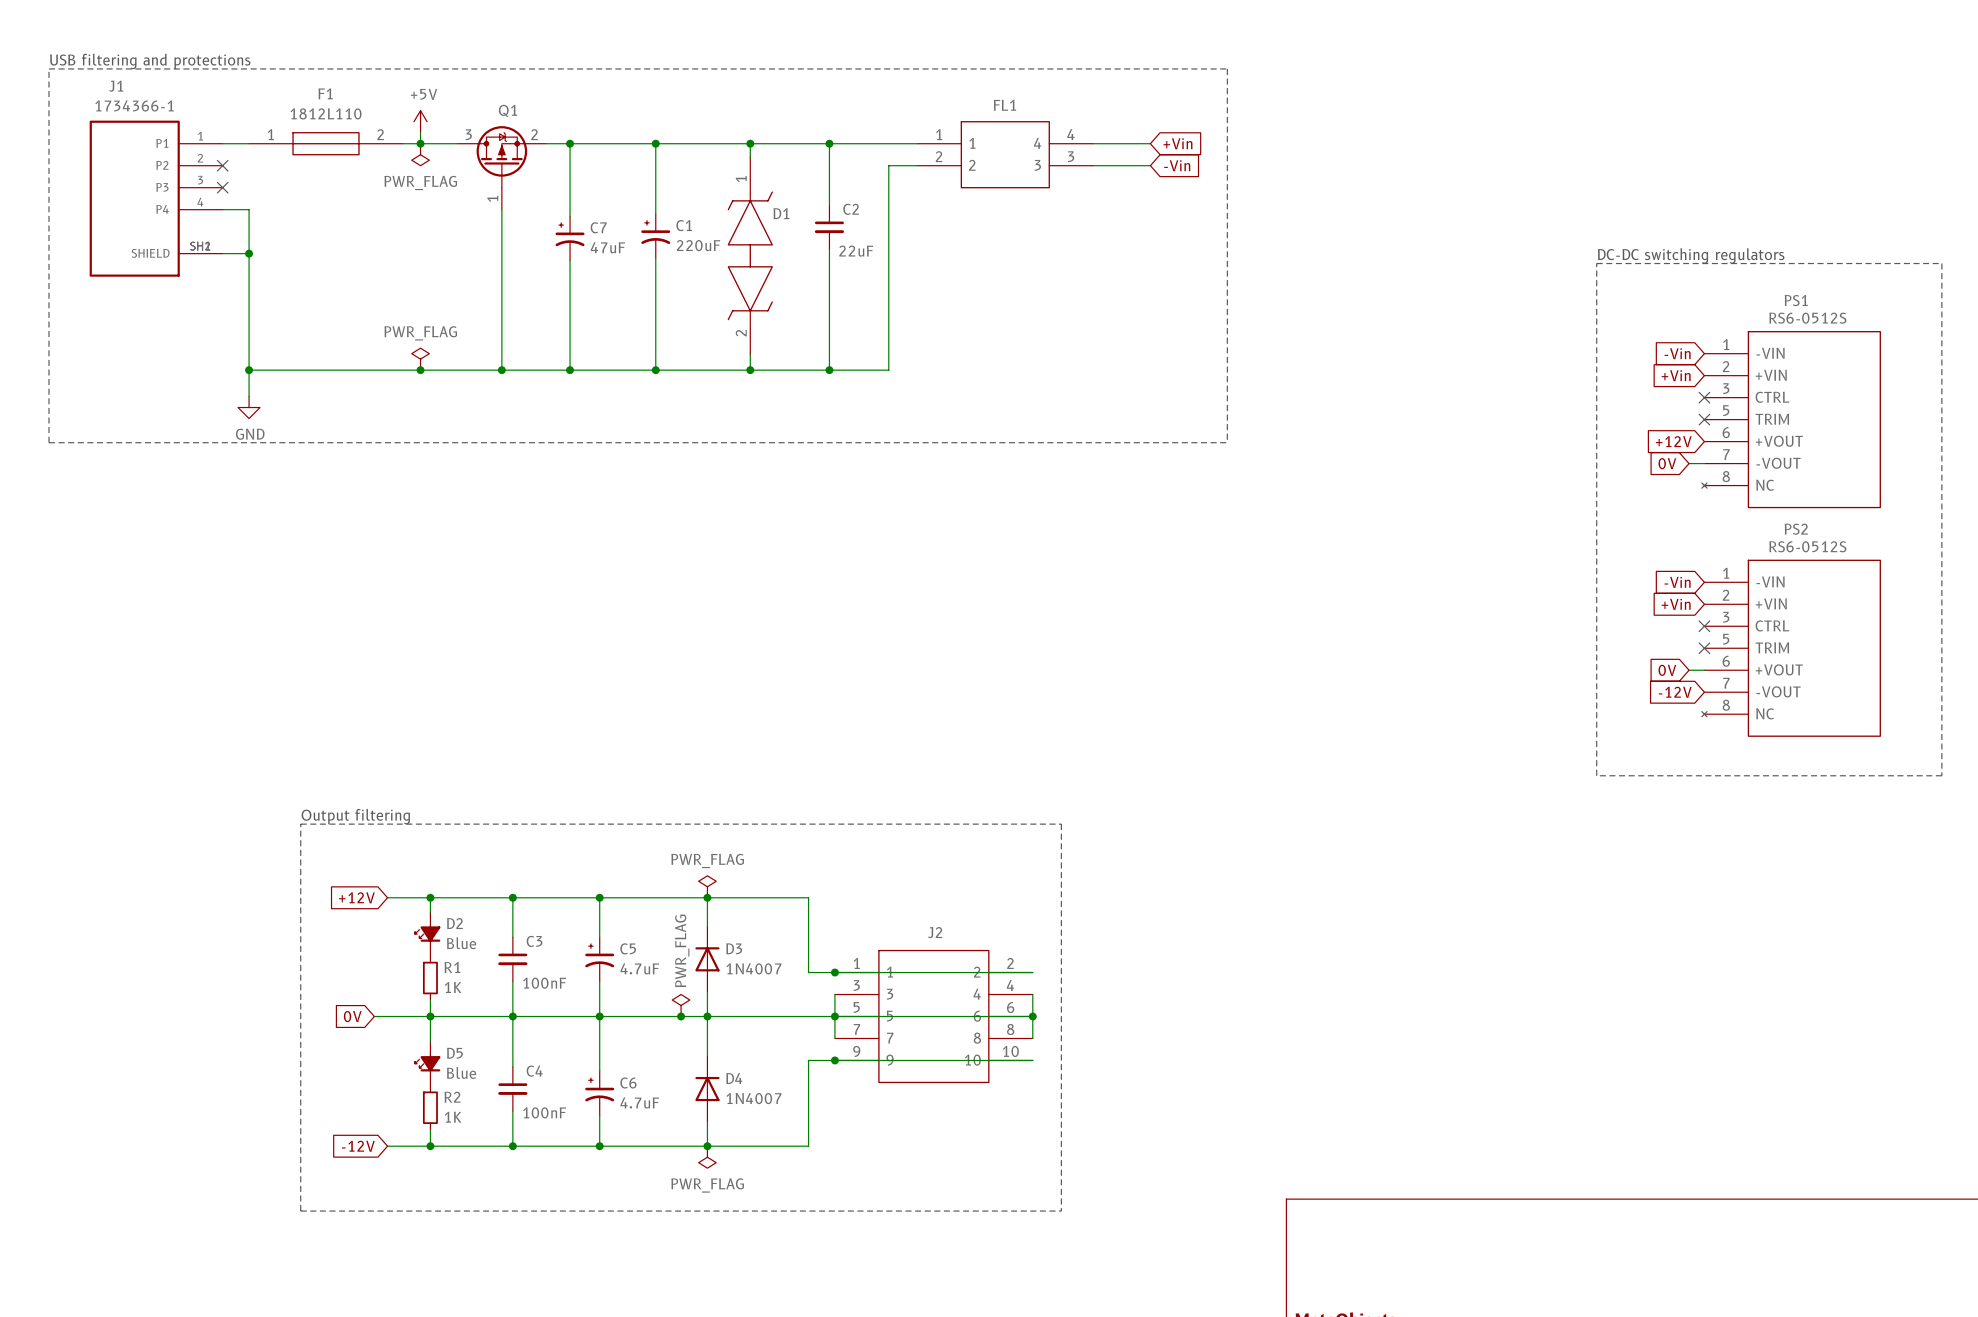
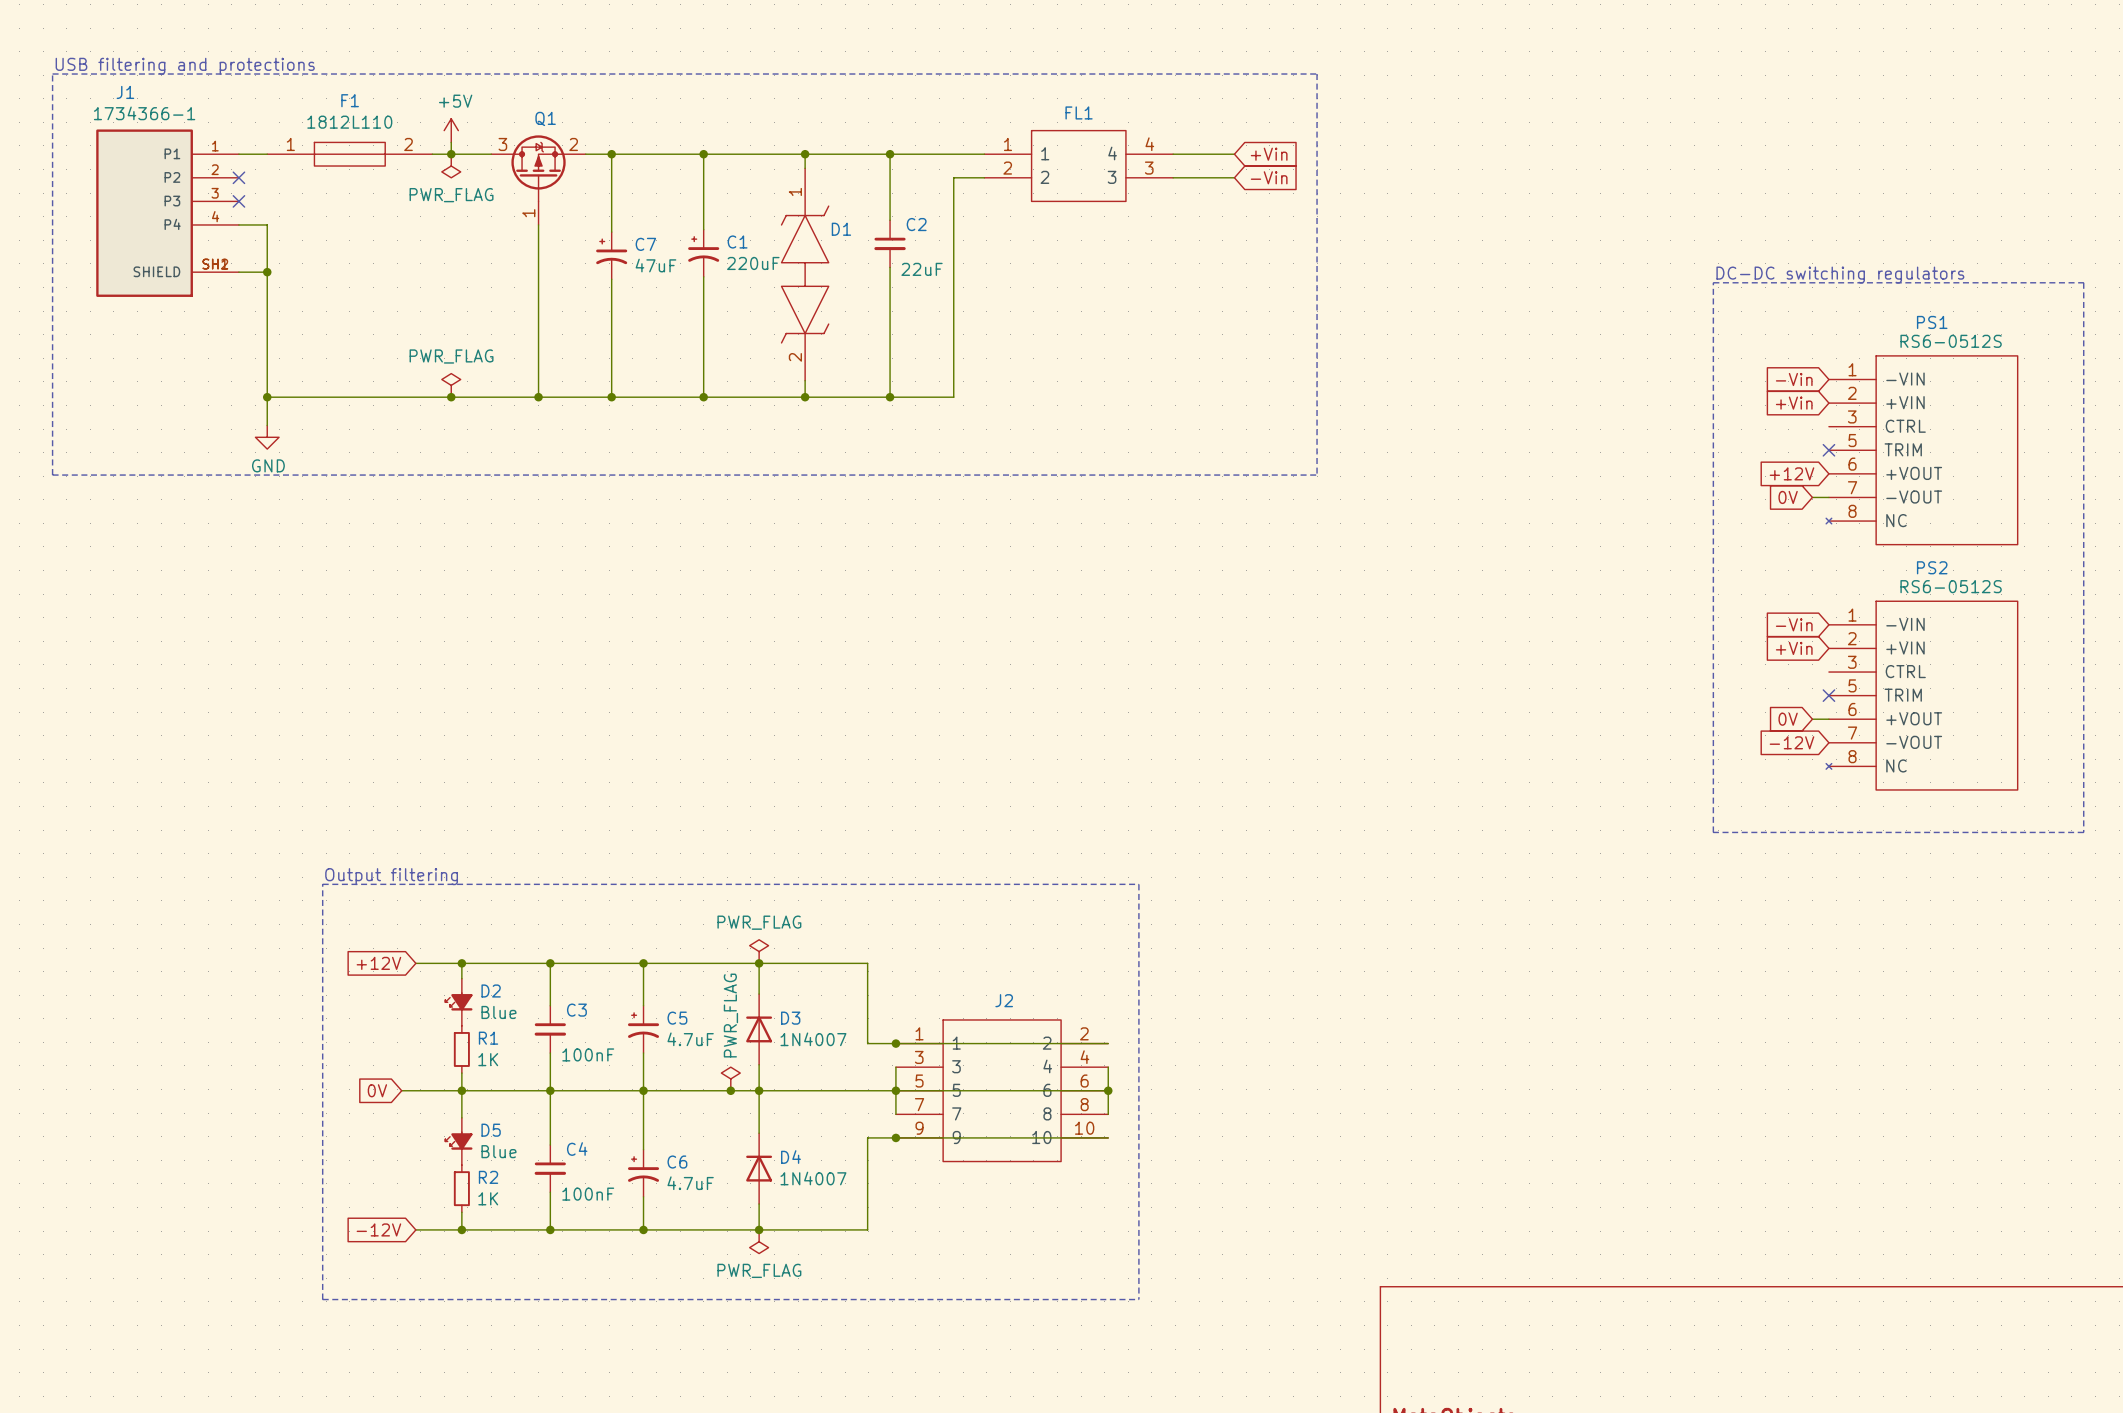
no-connect mark: (1704, 397) -> none
no-connect mark: (1704, 626) -> none

